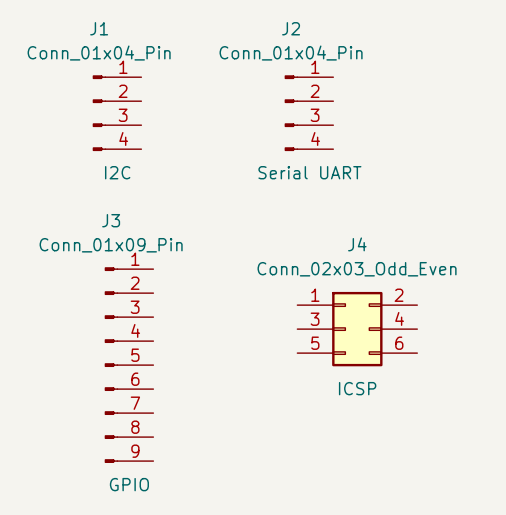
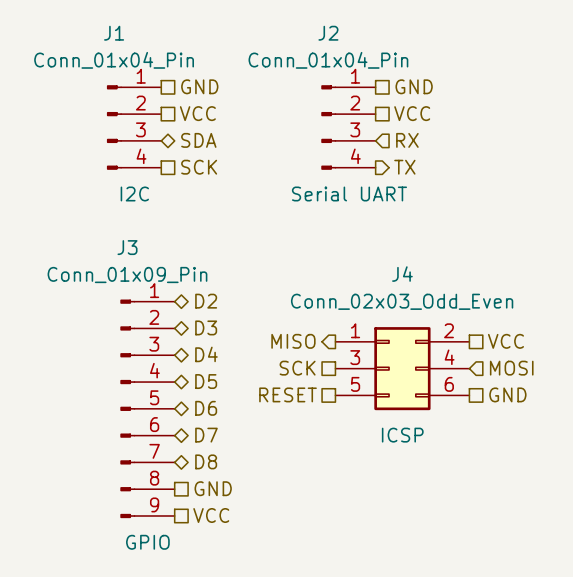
hierarchical label: none -> GND (199, 86)
hierarchical label: none -> GND (414, 86)
hierarchical label: none -> VCC (197, 113)
hierarchical label: none -> VCC (412, 113)
hierarchical label: none -> SDA (198, 140)
hierarchical label: none -> RX (407, 140)
hierarchical label: none -> SCK (199, 167)
hierarchical label: none -> TX (404, 167)
hierarchical label: none -> D2 (206, 301)
hierarchical label: none -> D3 (206, 327)
hierarchical label: none -> MISO (293, 341)
hierarchical label: none -> VCC (505, 341)
hierarchical label: none -> D4 (206, 354)
hierarchical label: none -> SCK (297, 368)
hierarchical label: none -> MOSI (511, 368)
hierarchical label: none -> D5 (206, 381)
hierarchical label: none -> RESET (288, 394)
hierarchical label: none -> GND (507, 394)
hierarchical label: none -> D6 (206, 408)
hierarchical label: none -> D7 (206, 435)
hierarchical label: none -> D8 (206, 461)
hierarchical label: none -> GND (213, 488)
hierarchical label: none -> VCC (211, 515)

